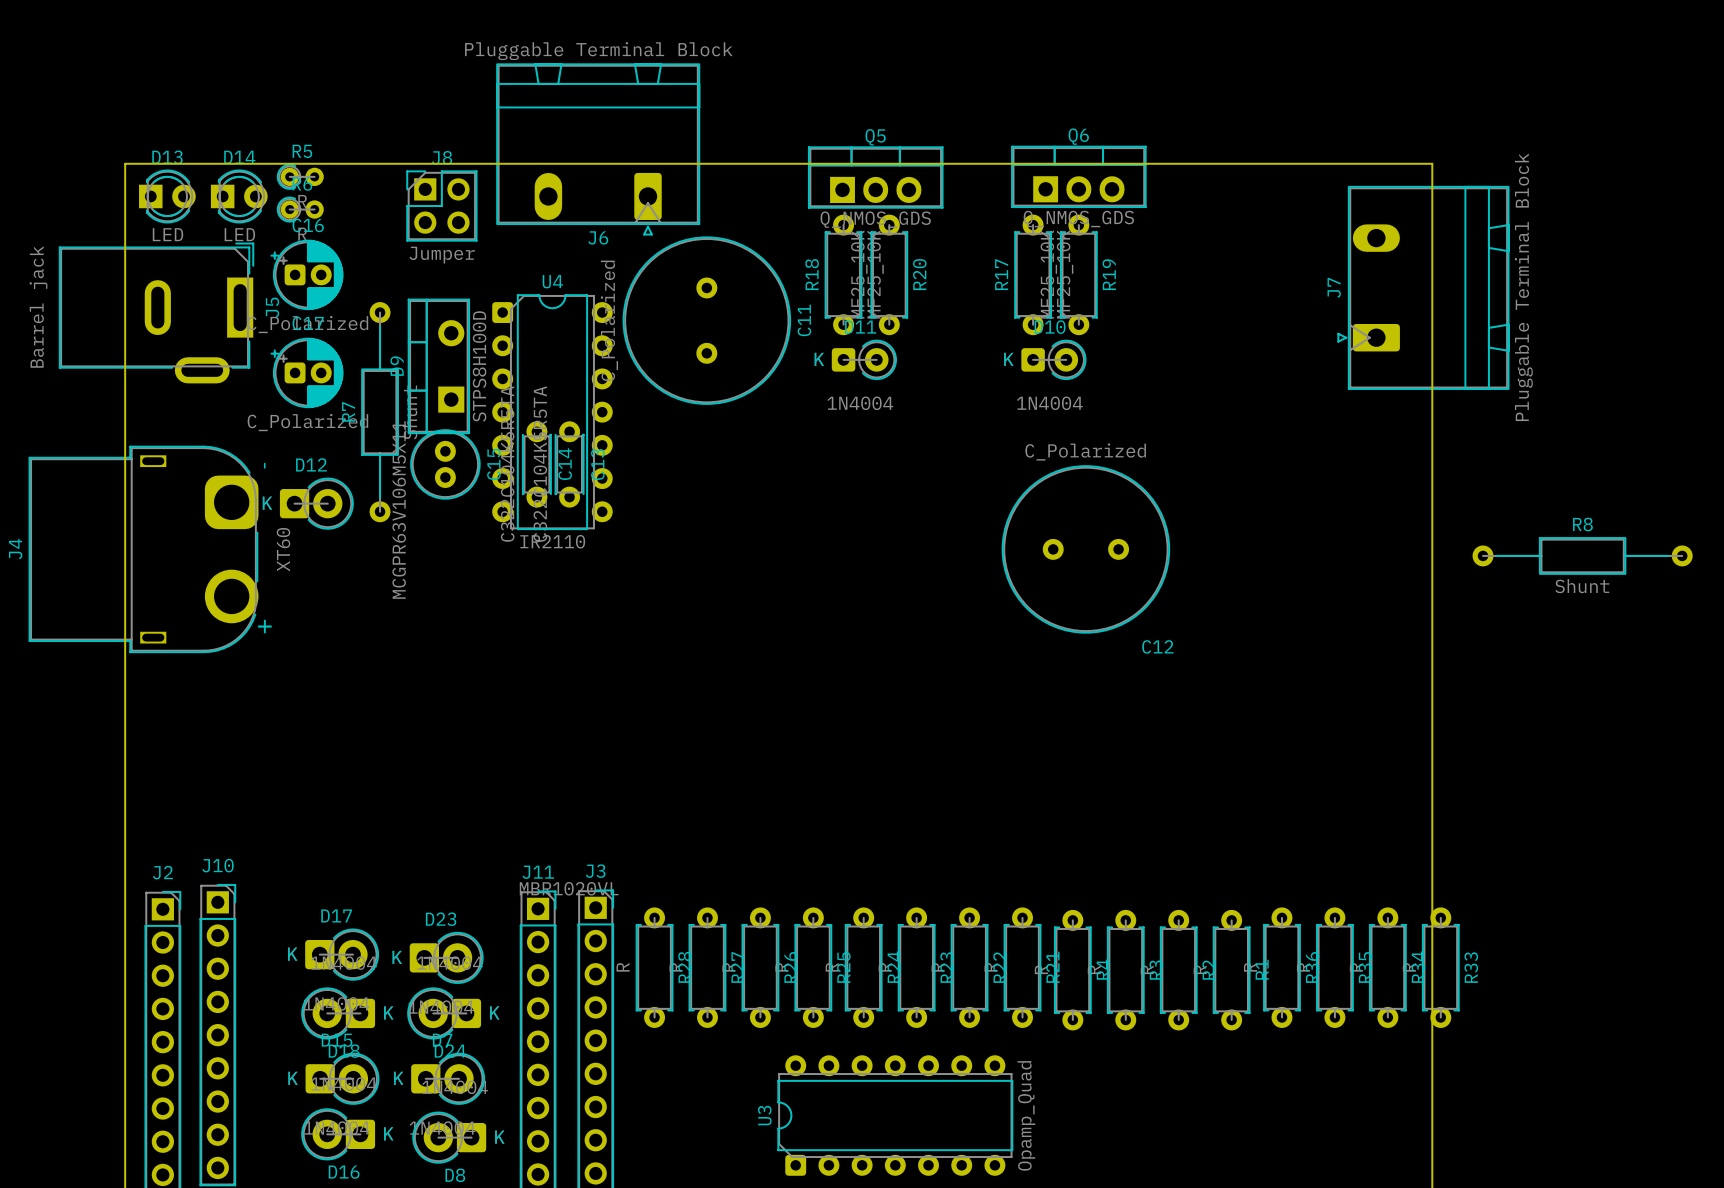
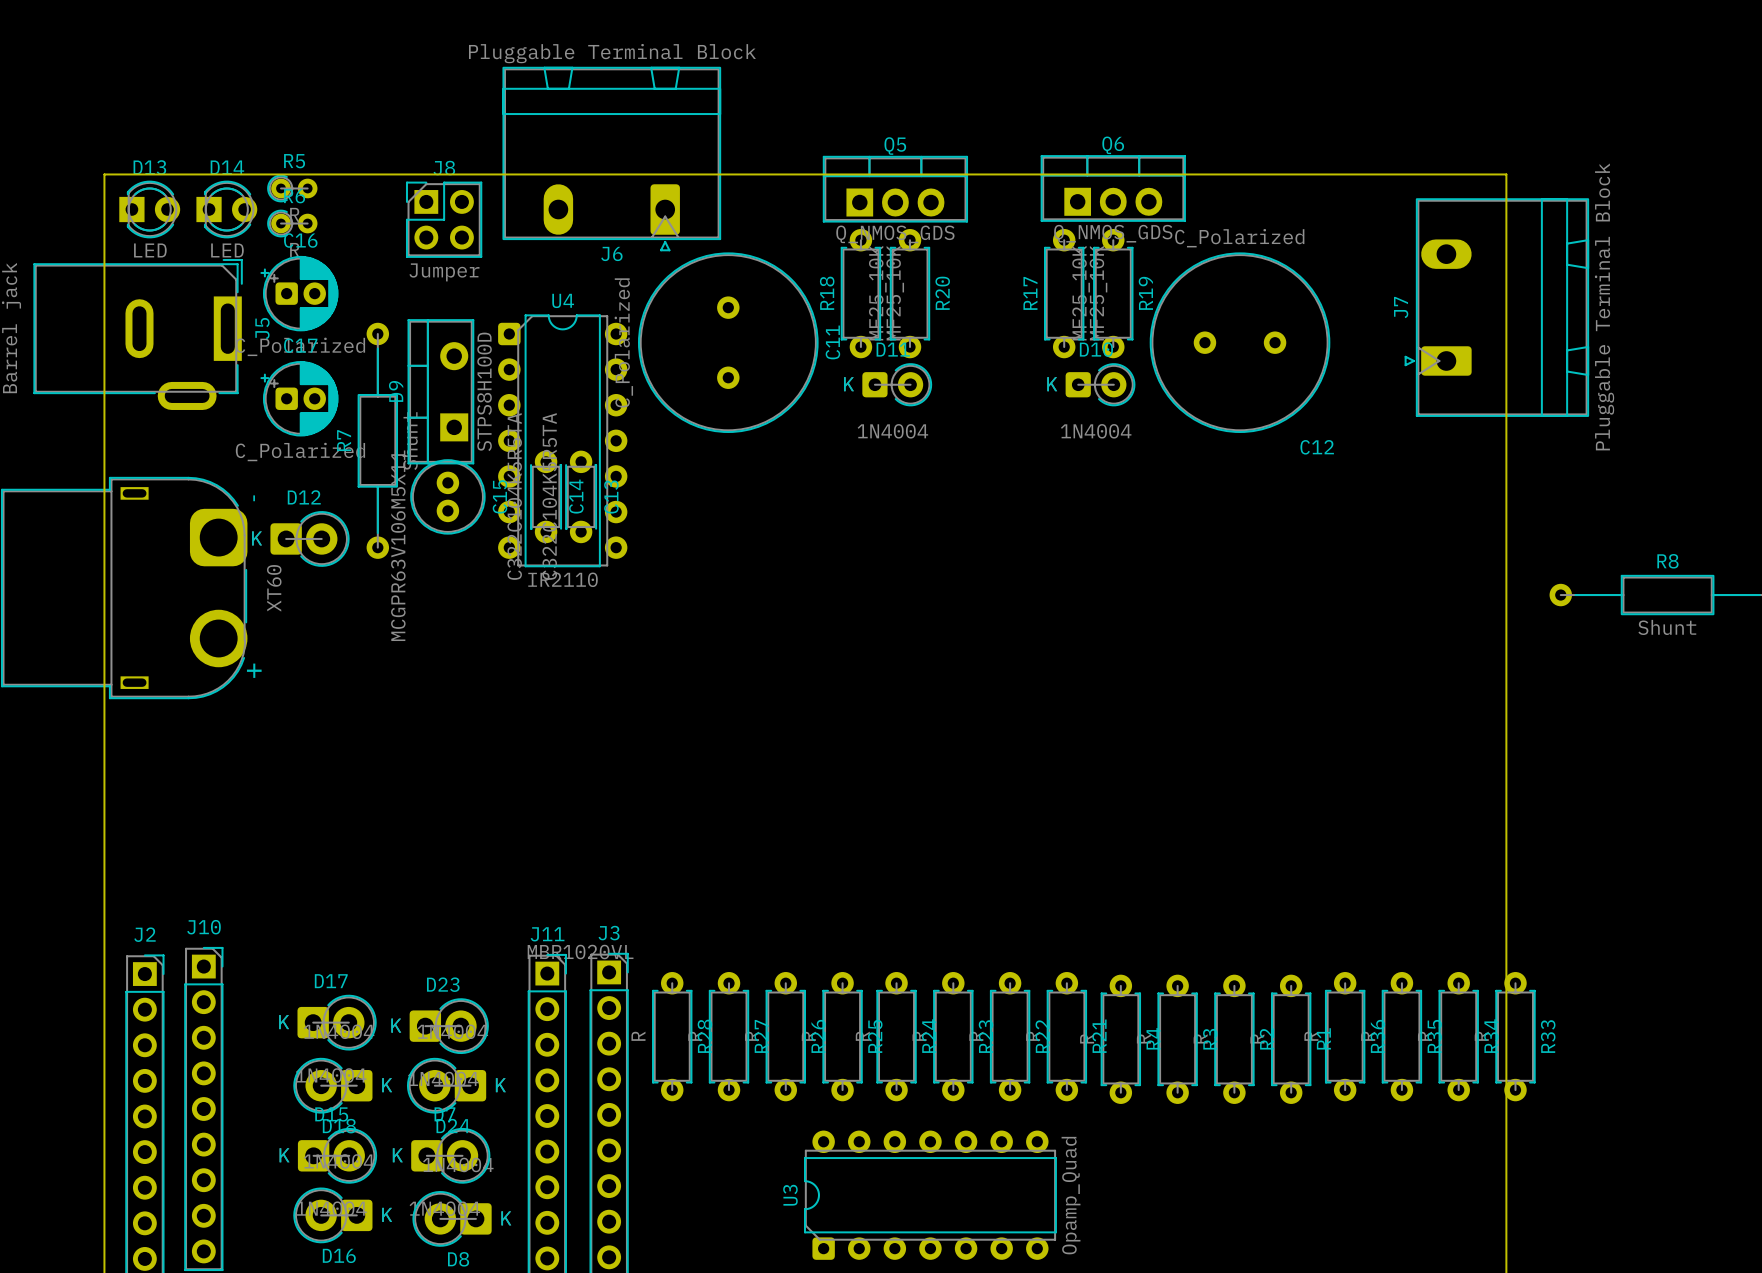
Q6 position: (1078, 176) -> (1113, 188)
Q5 position: (875, 177) -> (895, 189)
R18 position: (843, 274) -> (860, 293)
R20 position: (889, 274) -> (909, 293)
R17 position: (1033, 274) -> (1064, 293)
R19 position: (1078, 274) -> (1113, 293)
C12 position: (1085, 549) -> (1240, 342)

